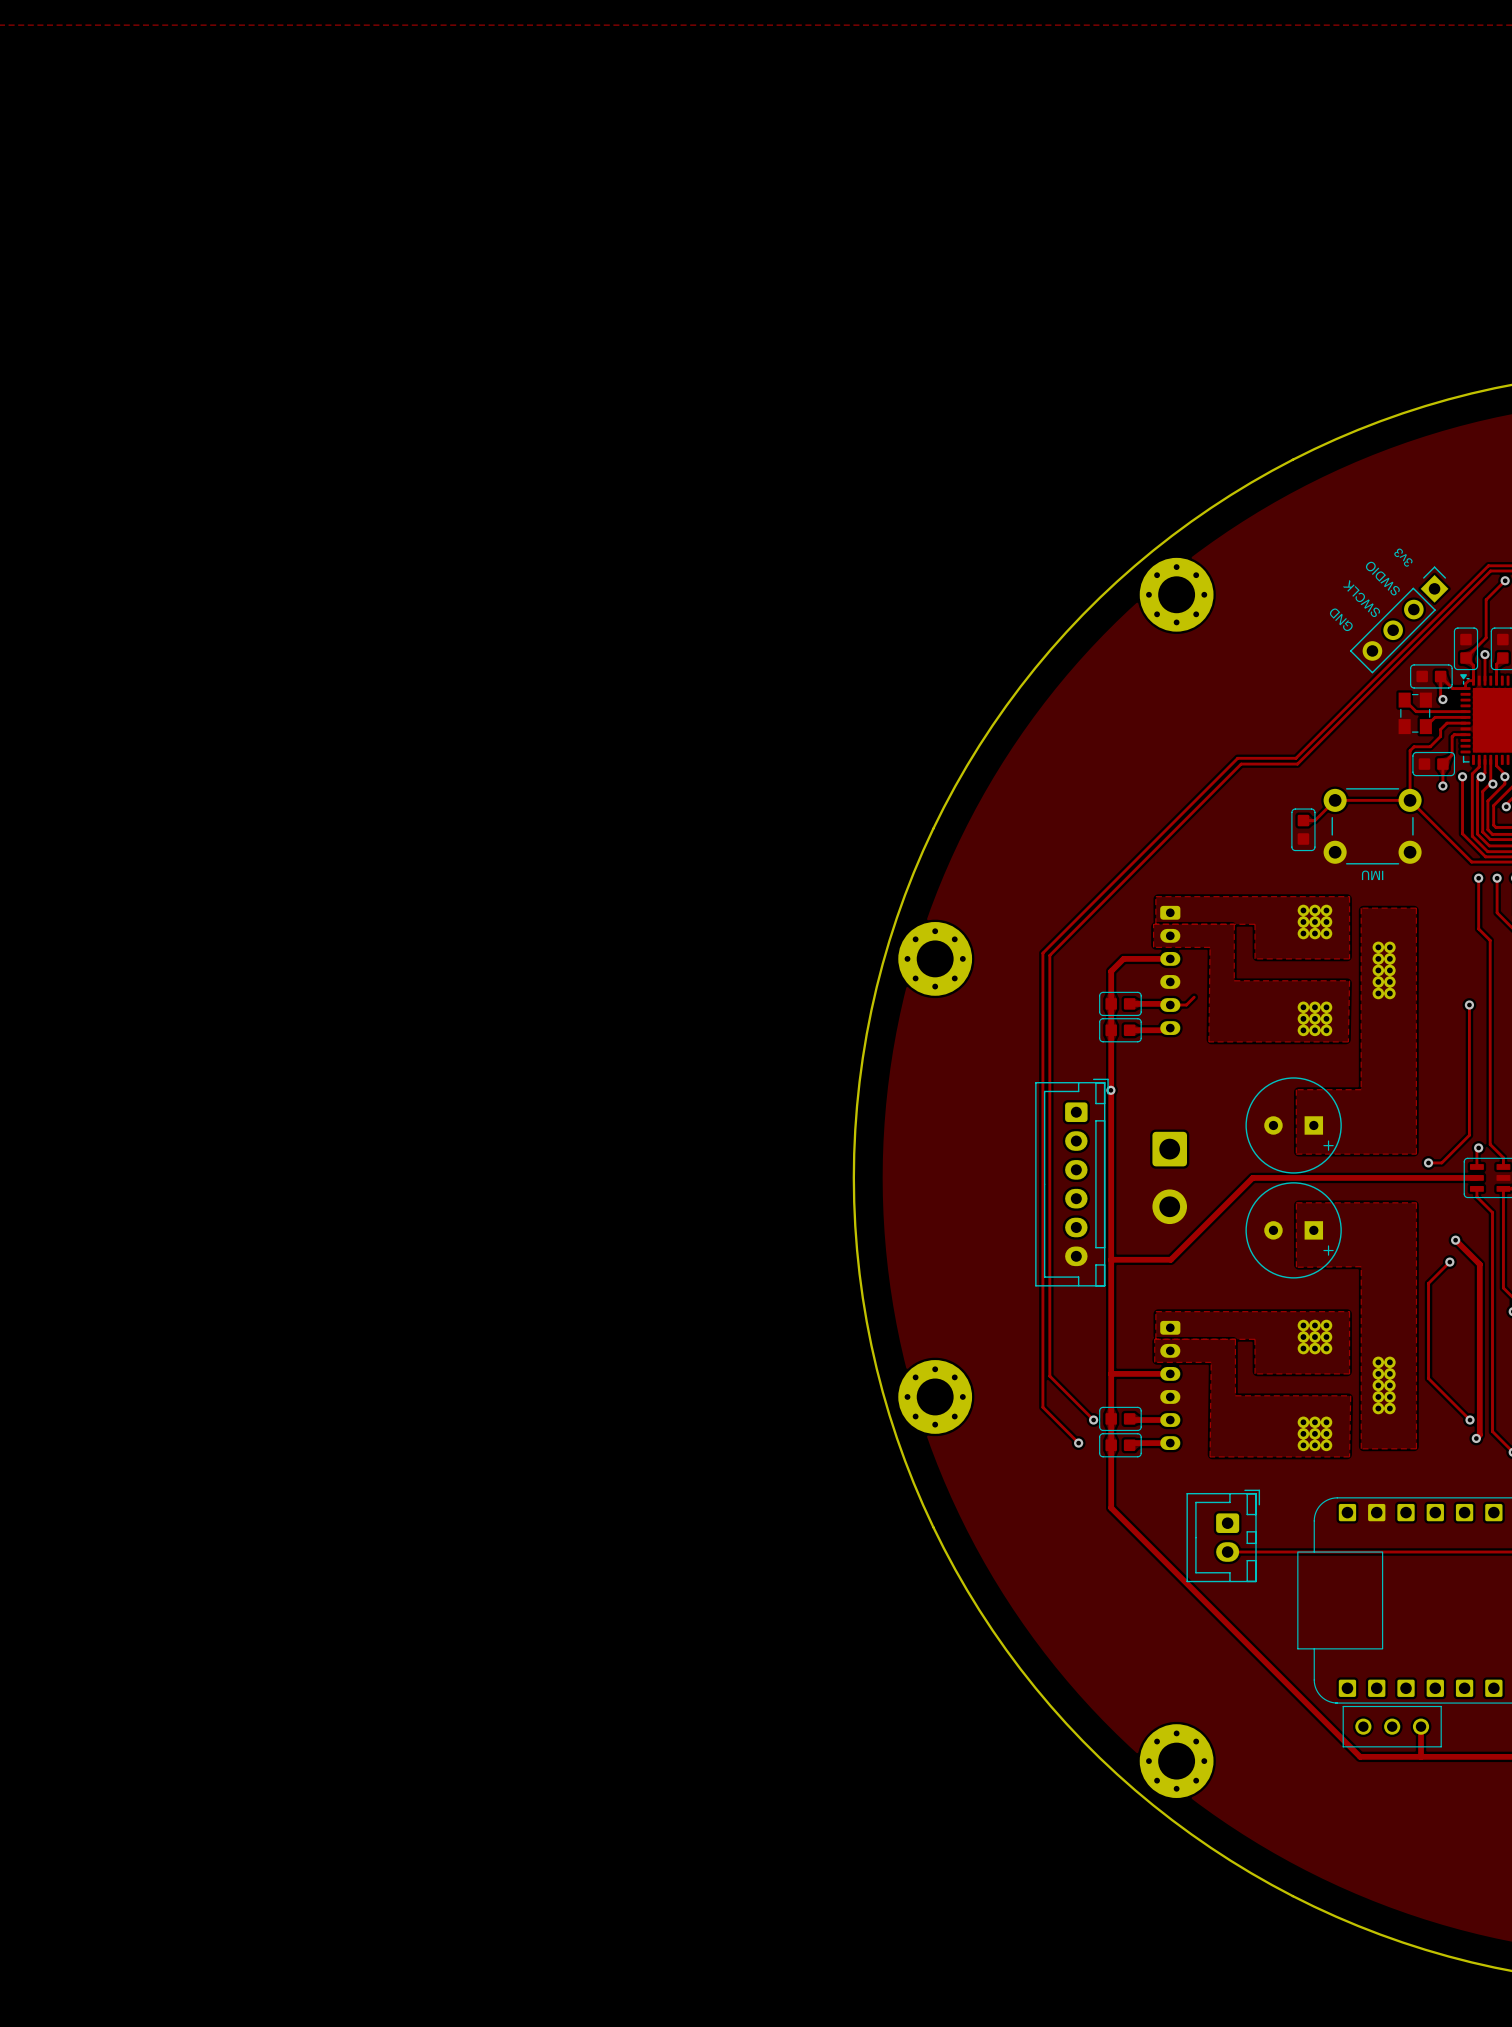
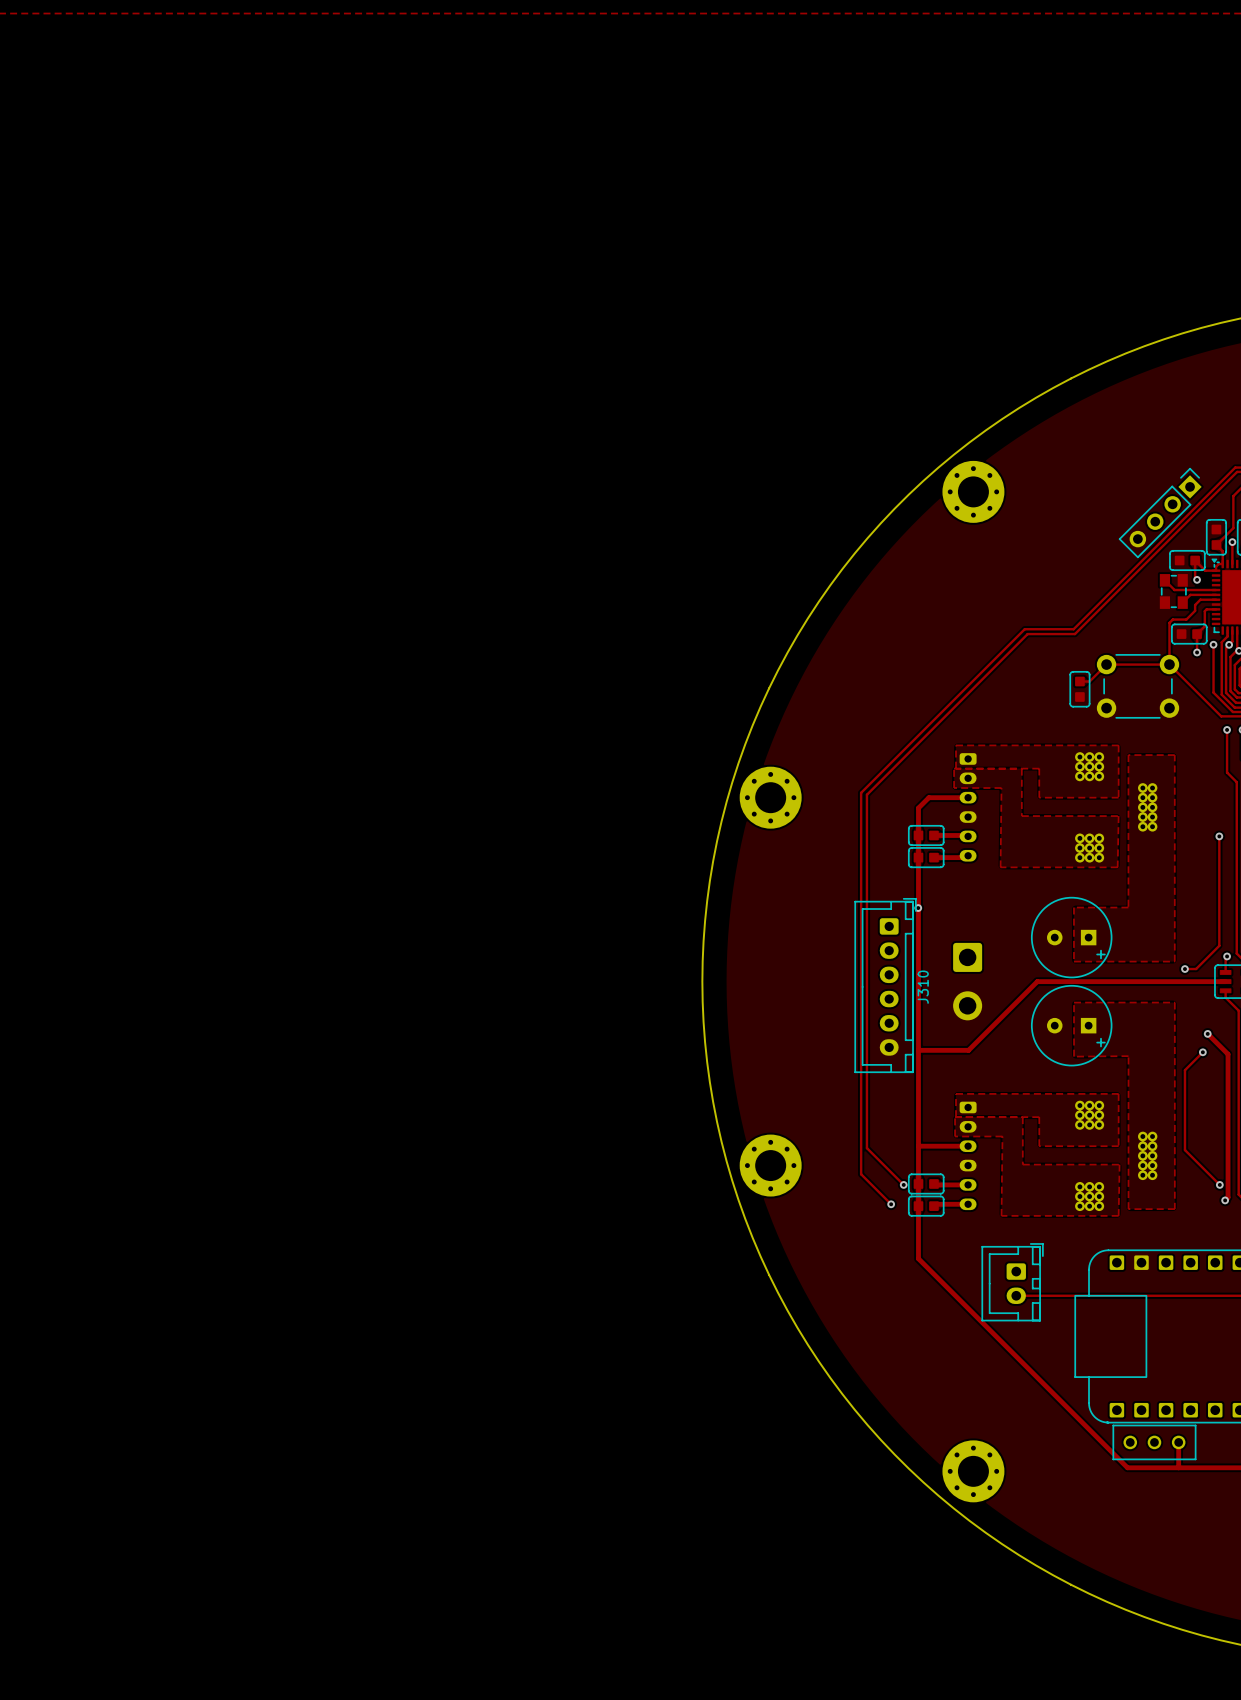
drawing: [1329, 548, 1413, 632] -> none
drawing: [1361, 870, 1384, 881] -> none
track: (1194, 997) (1186, 1005) (1170, 1005) -> none
J310 name: none -> J310 (923, 987)

